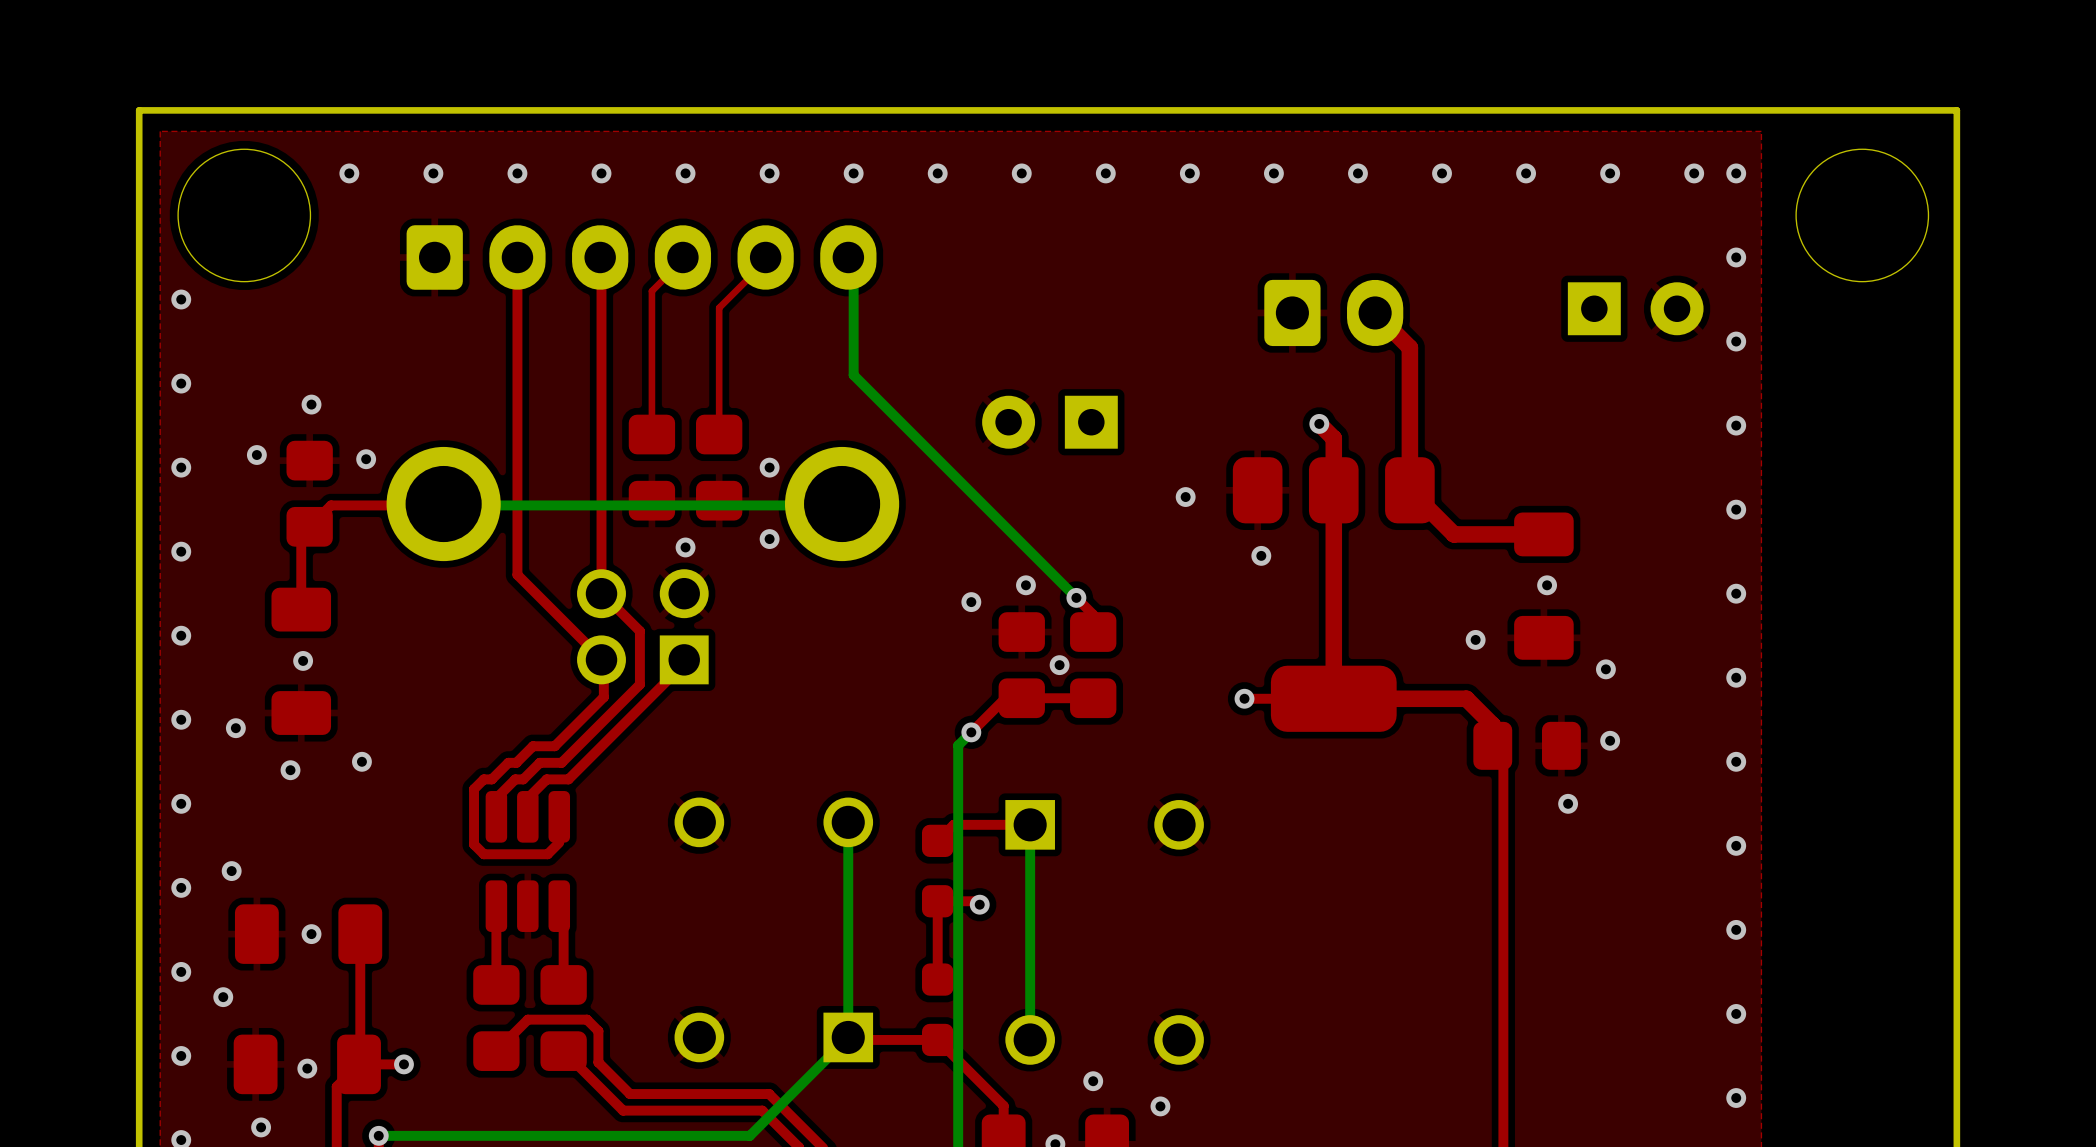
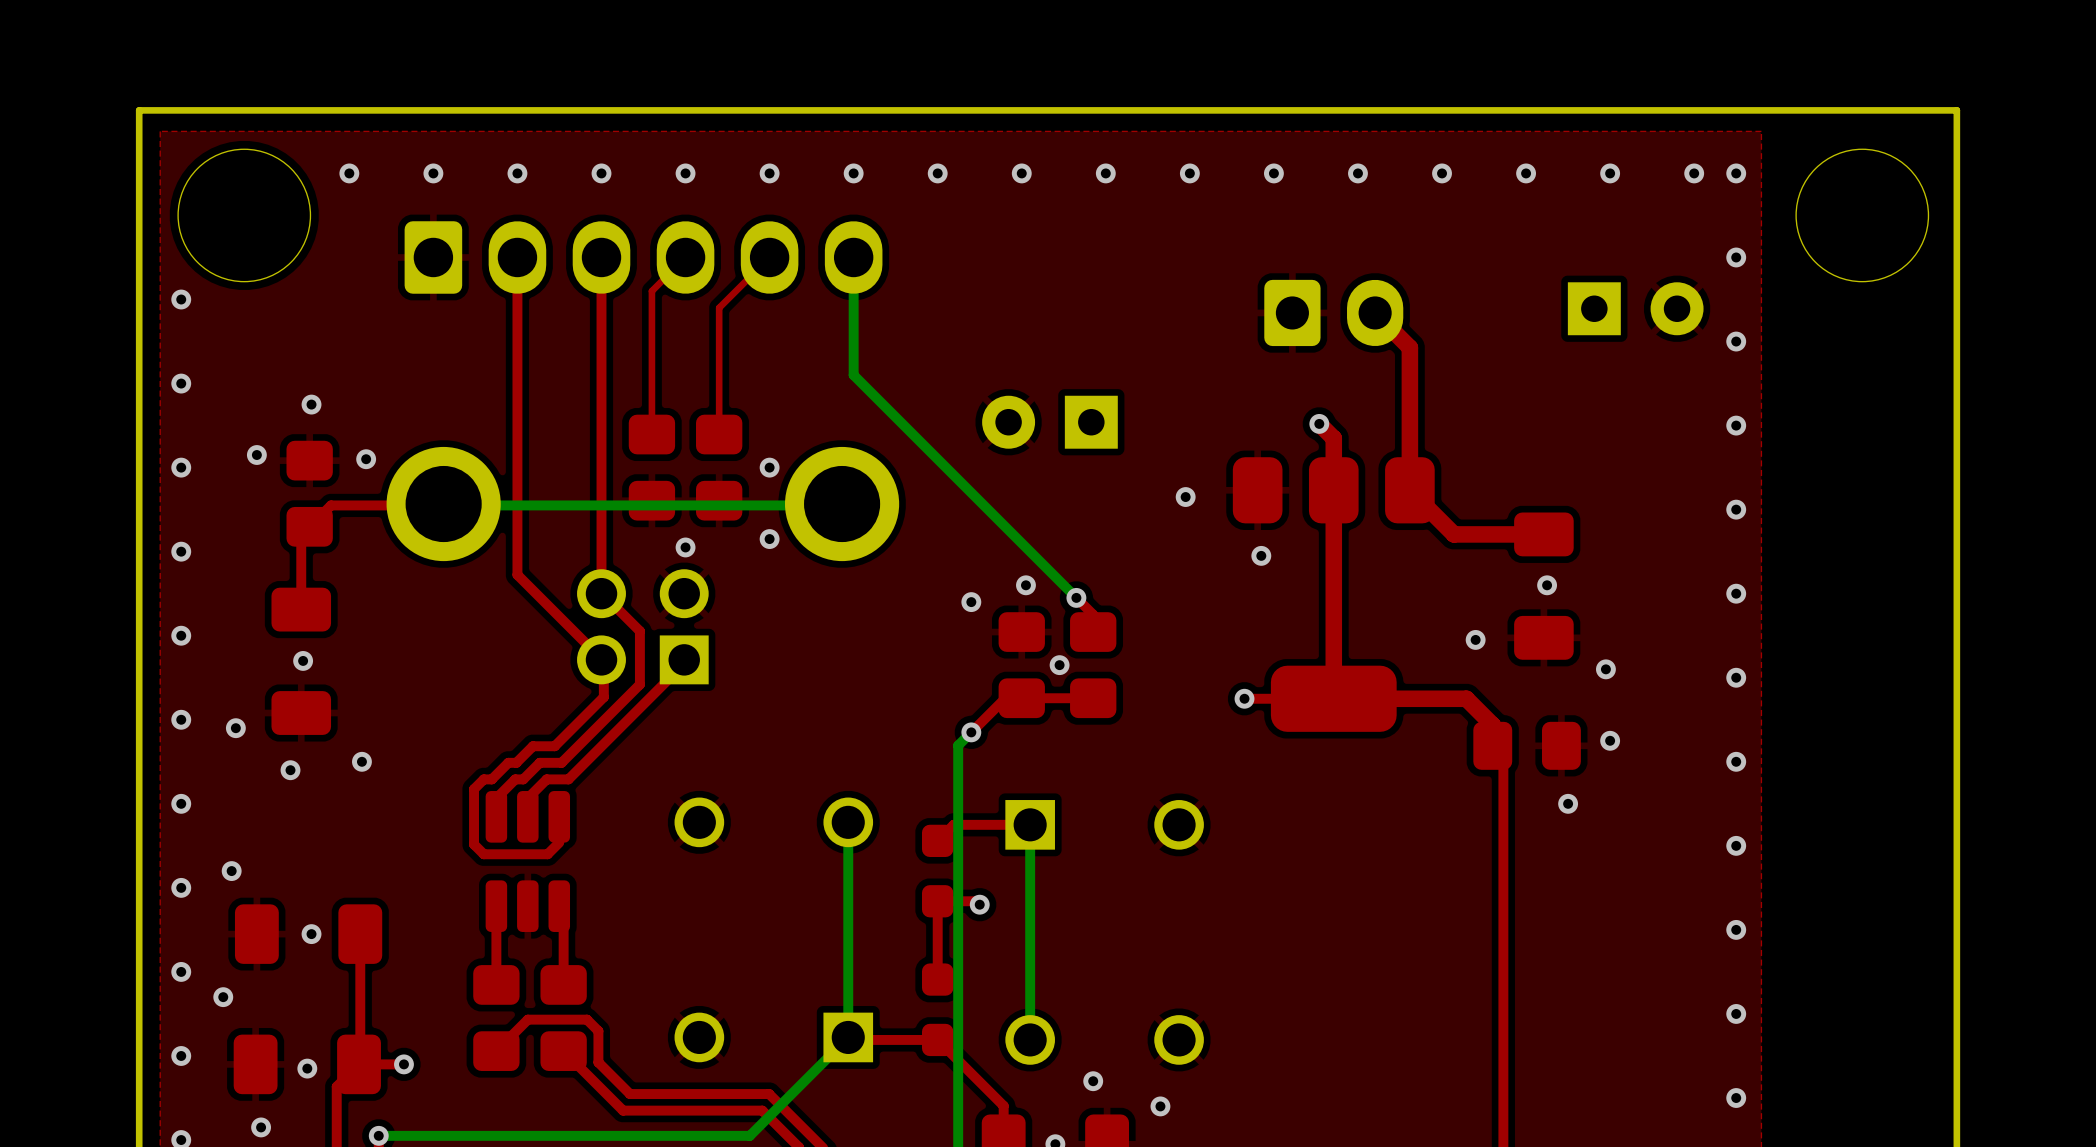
part footprint: [406, 225, 877, 290] -> [404, 221, 883, 294]

